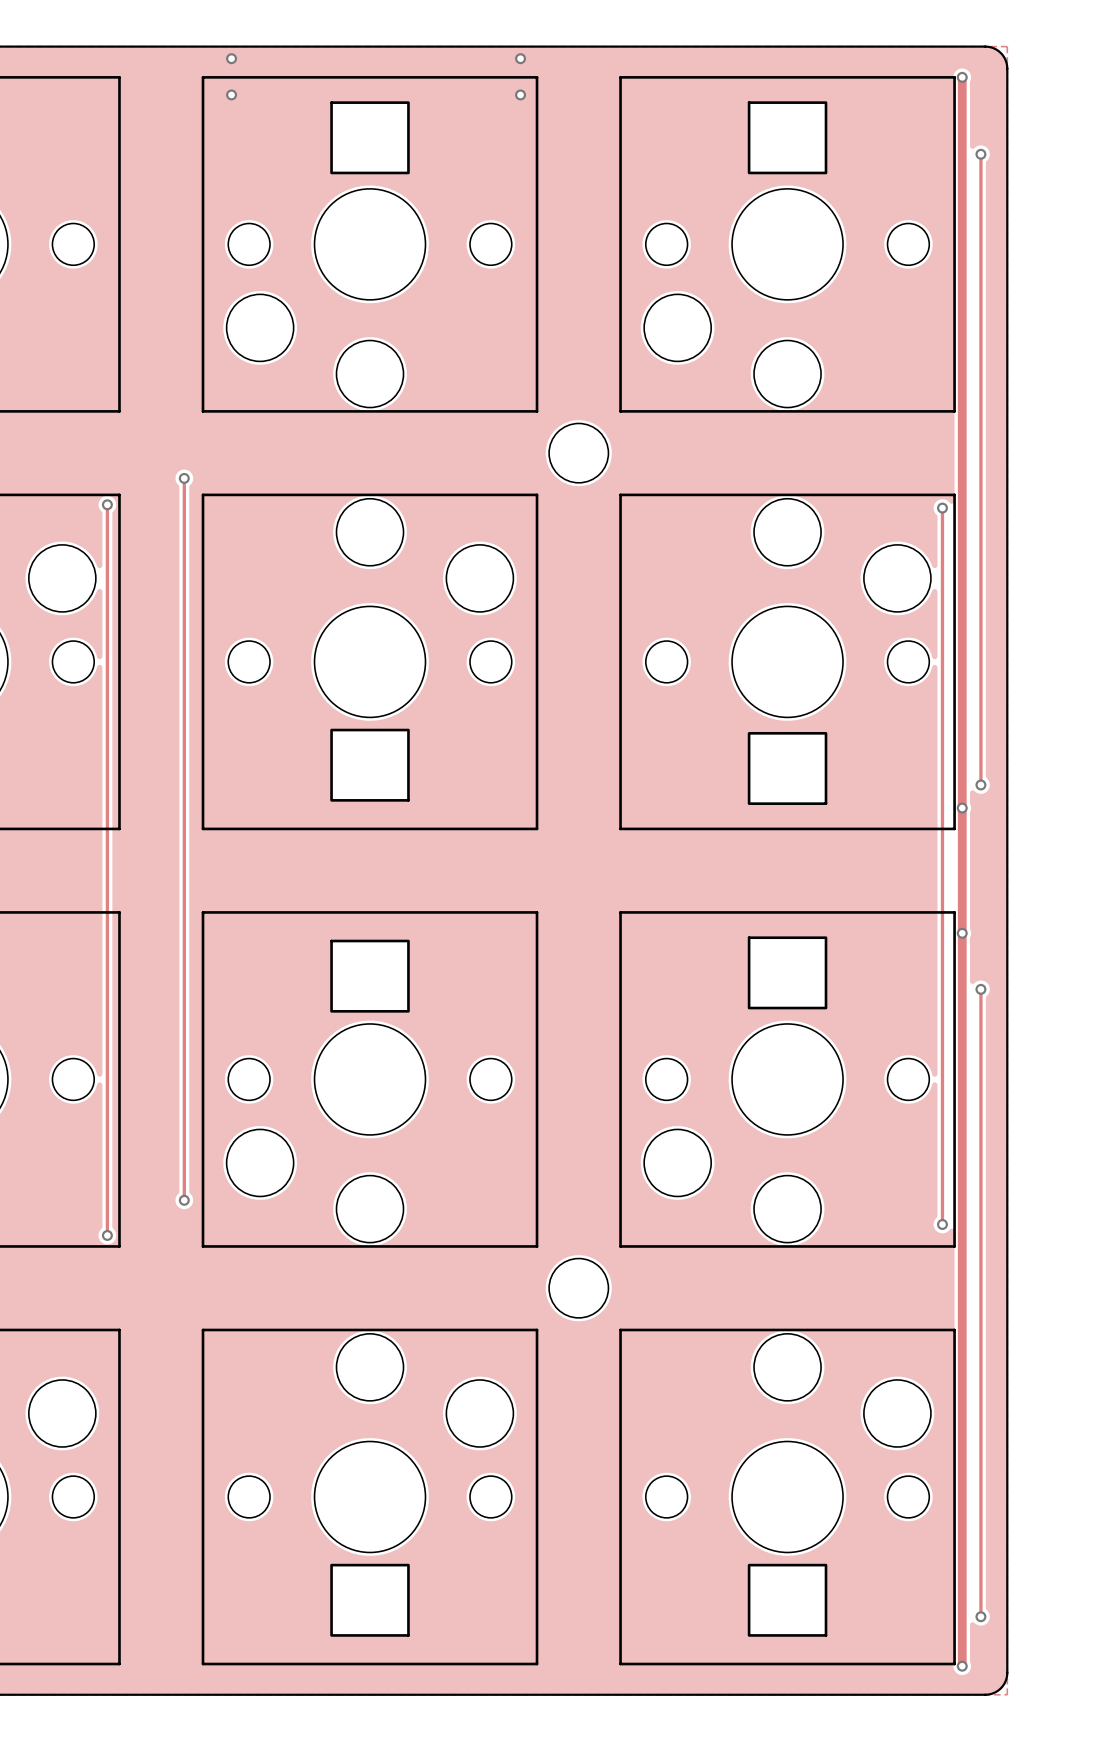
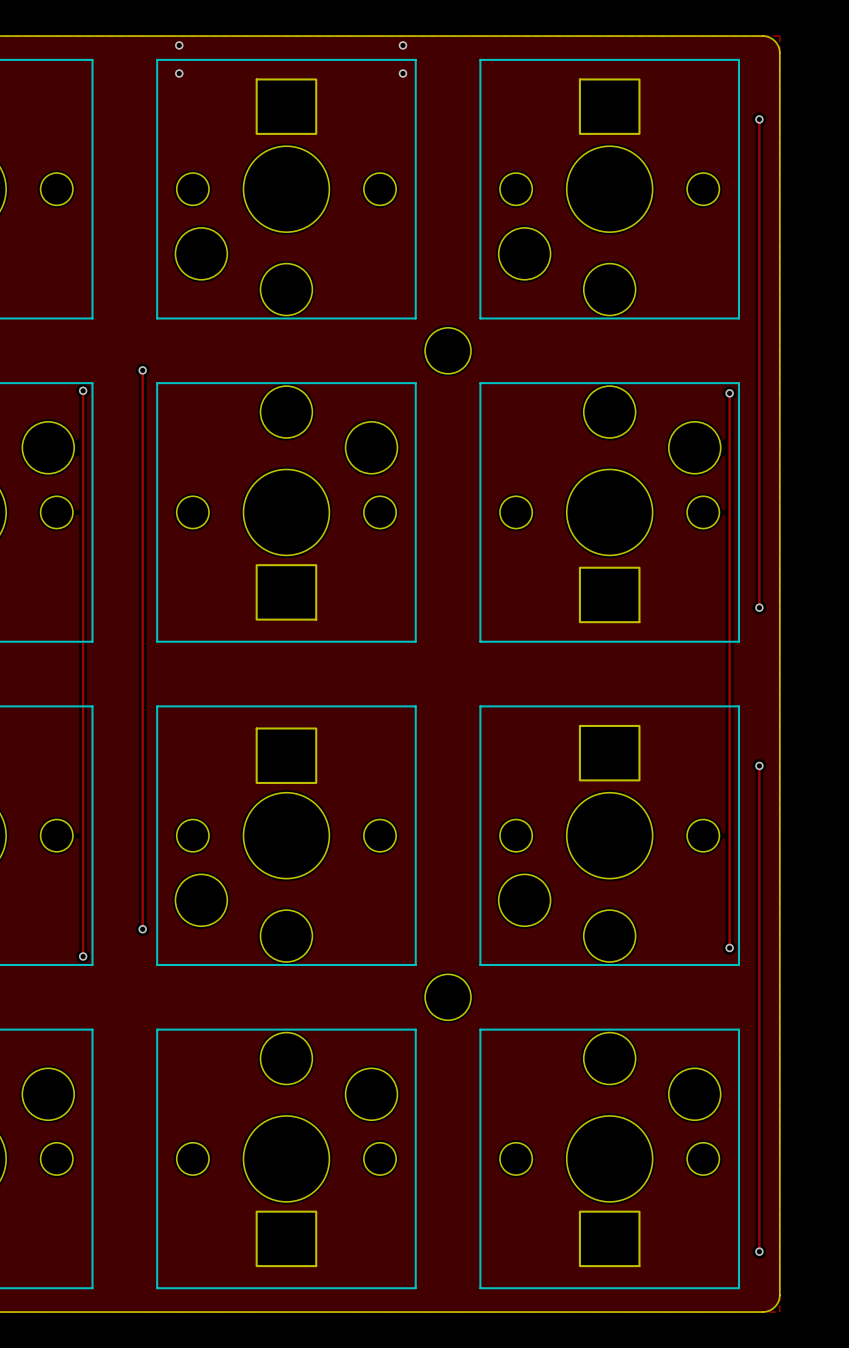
track: (962, 77) (962, 1666) -> none
via: (962, 77) -> none
via: (962, 808) -> none
via: (962, 933) -> none
via: (962, 1666) -> none

